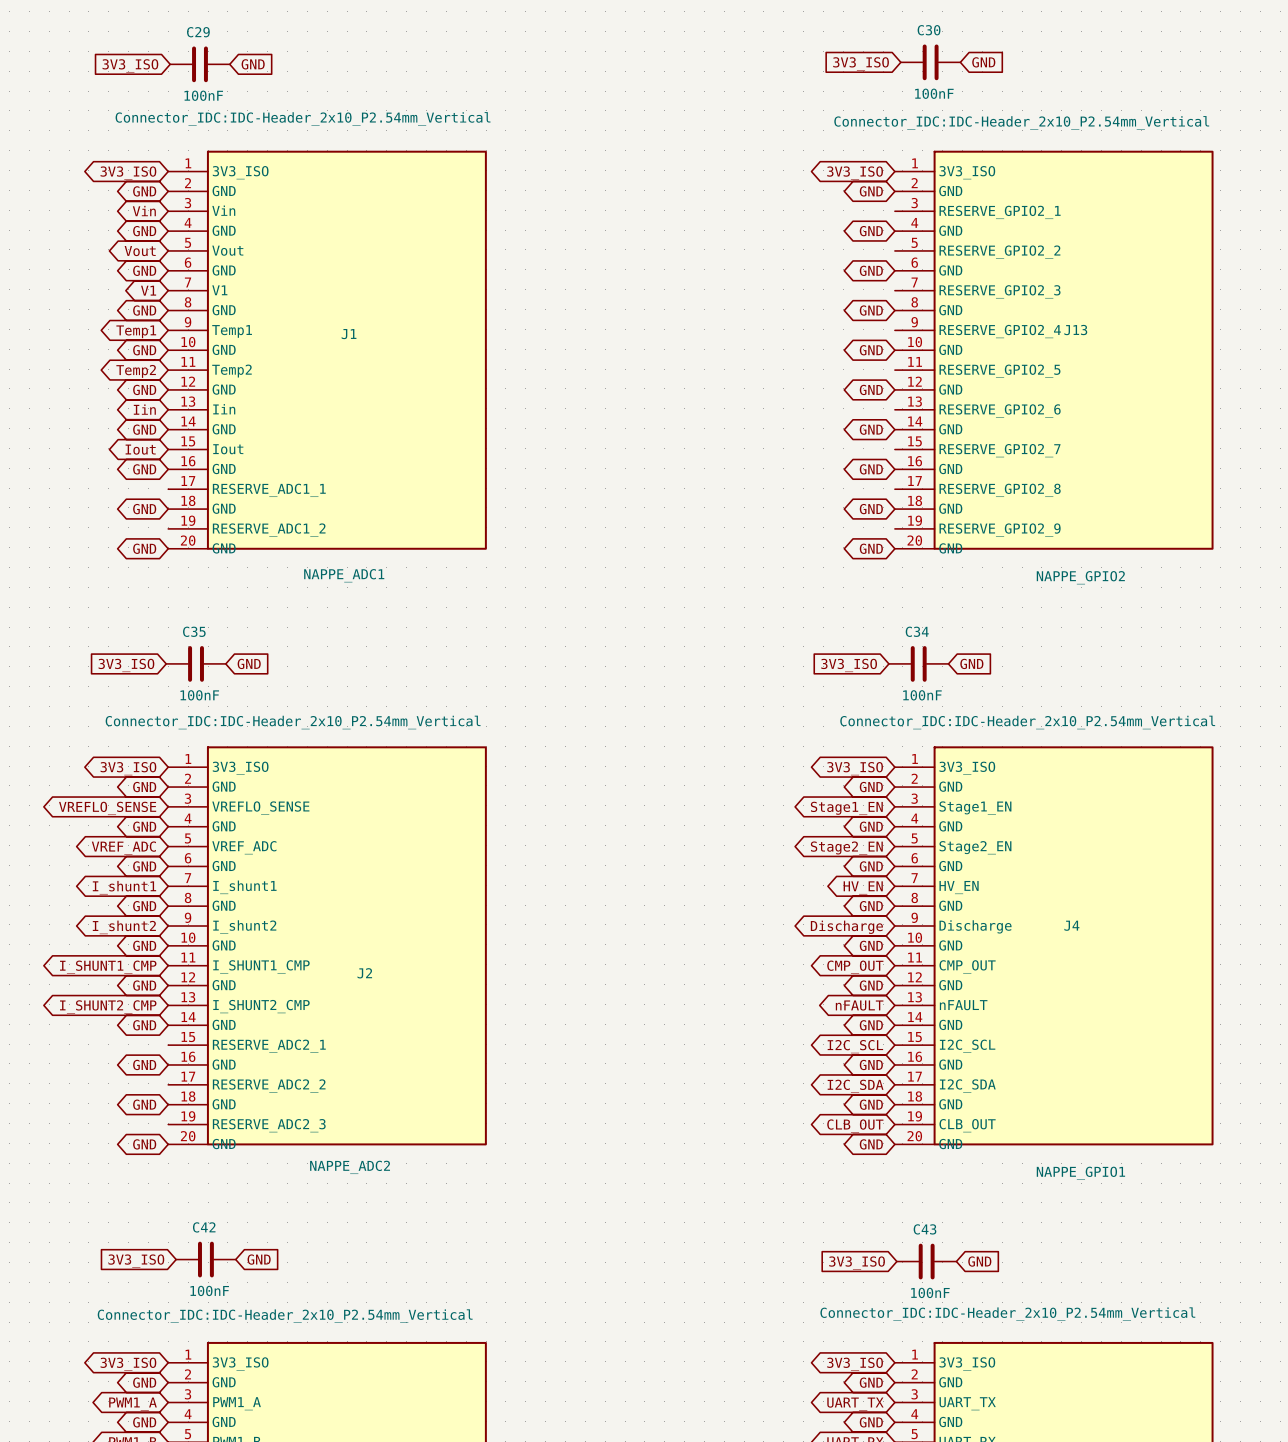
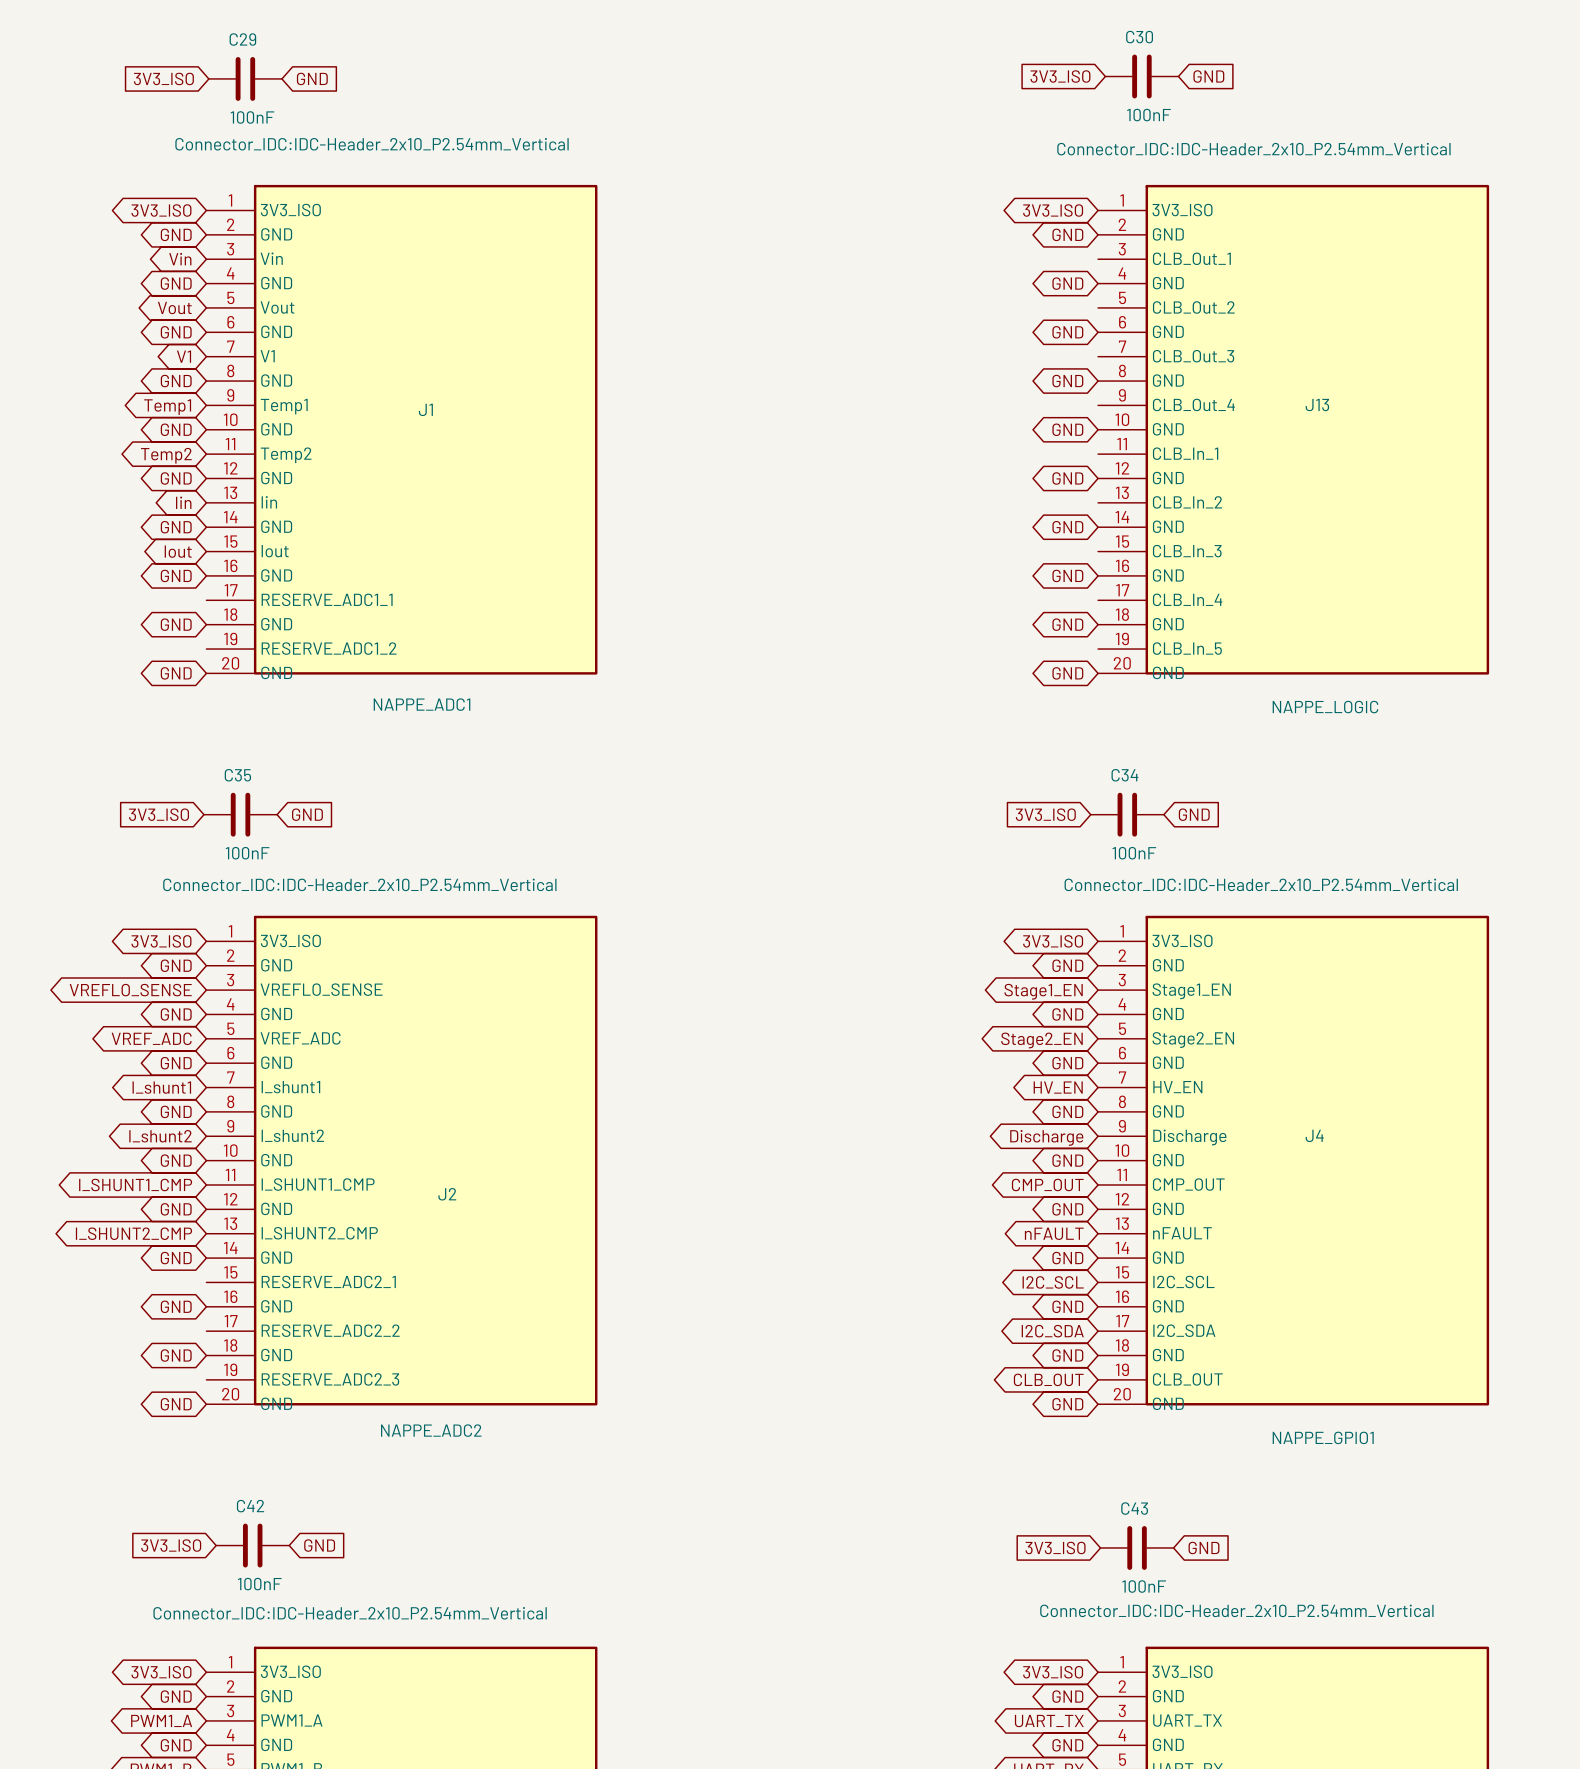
J13 symbol: [894, 150, 1214, 550] -> [1098, 184, 1490, 675]
J13 value: NAPPE_GPIO2 (1080, 577) -> NAPPE_LOGIC (1325, 707)

